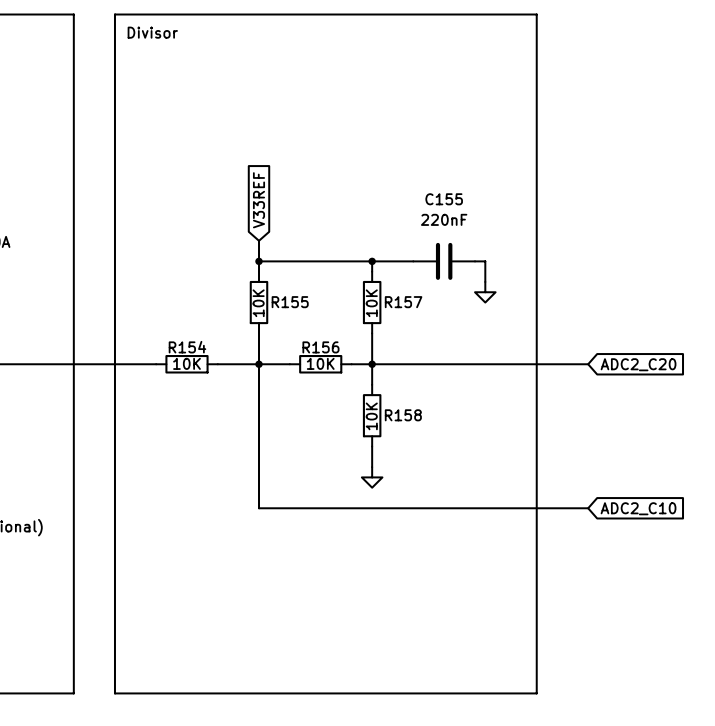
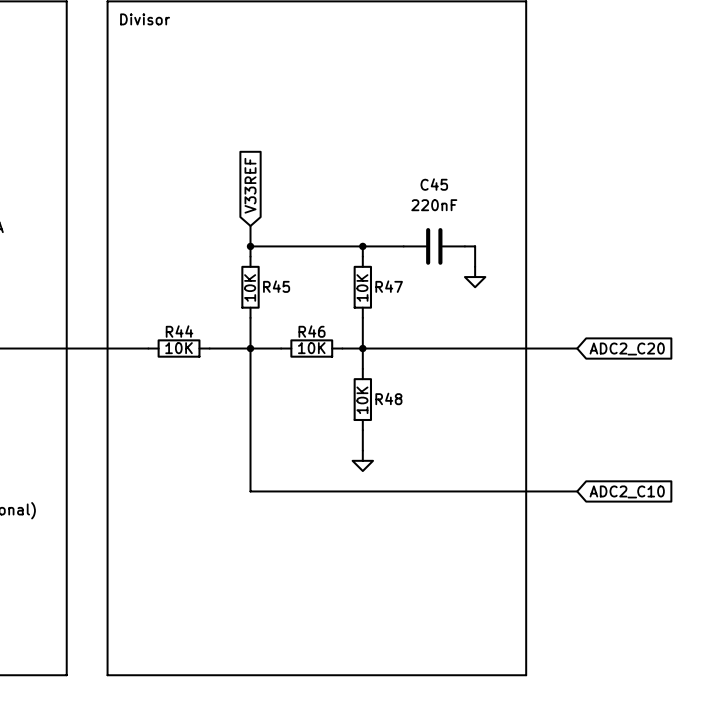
C155 name: C155 (444, 199) -> C45 (434, 184)
R155 name: R155 (290, 302) -> R45 (276, 286)
R157 name: R157 (403, 302) -> R47 (389, 286)
R154 name: R154 (187, 347) -> R44 (179, 331)
R156 name: R156 (320, 347) -> R46 (312, 331)
R158 name: R158 (403, 415) -> R48 (388, 398)

